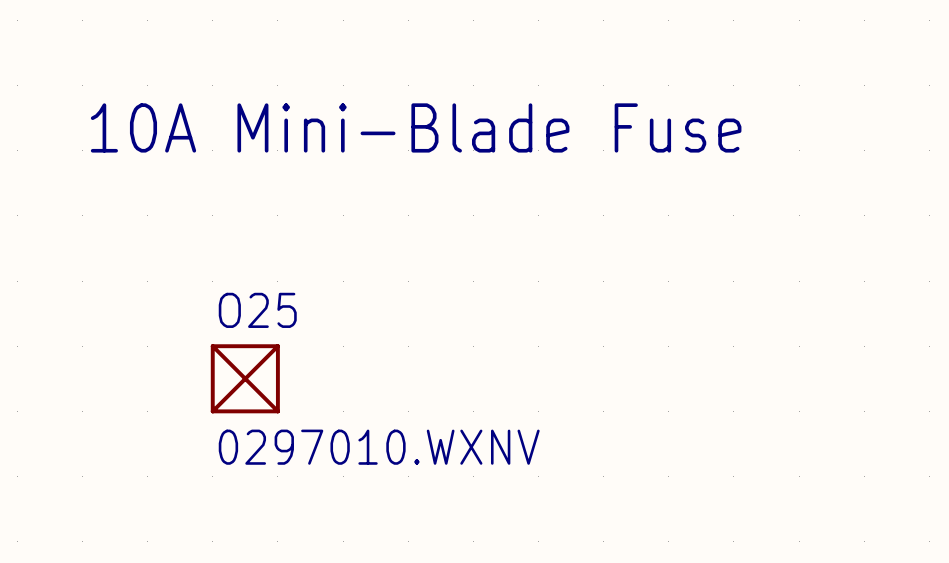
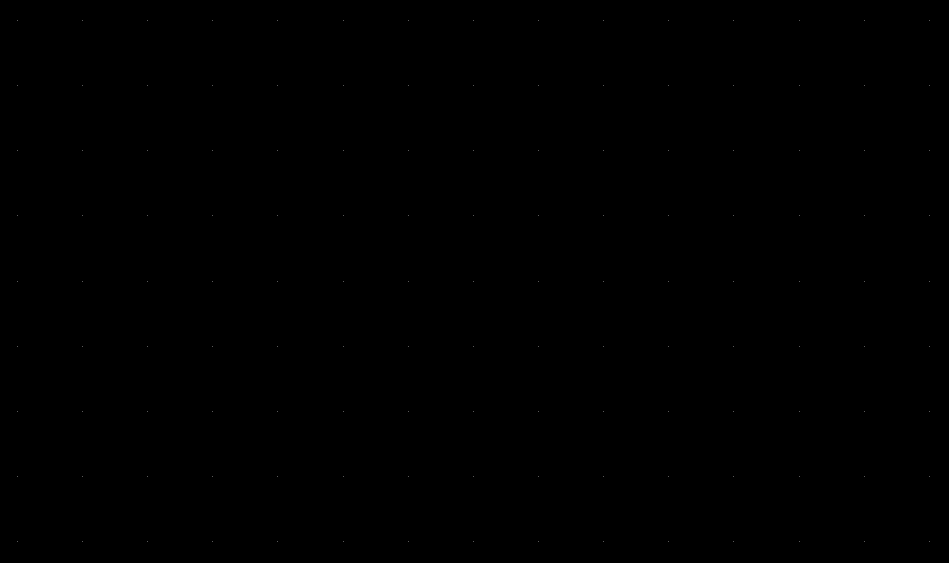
text: 10A Mini-Blade Fuse (416, 127) -> none
O25: (245, 378) -> none

